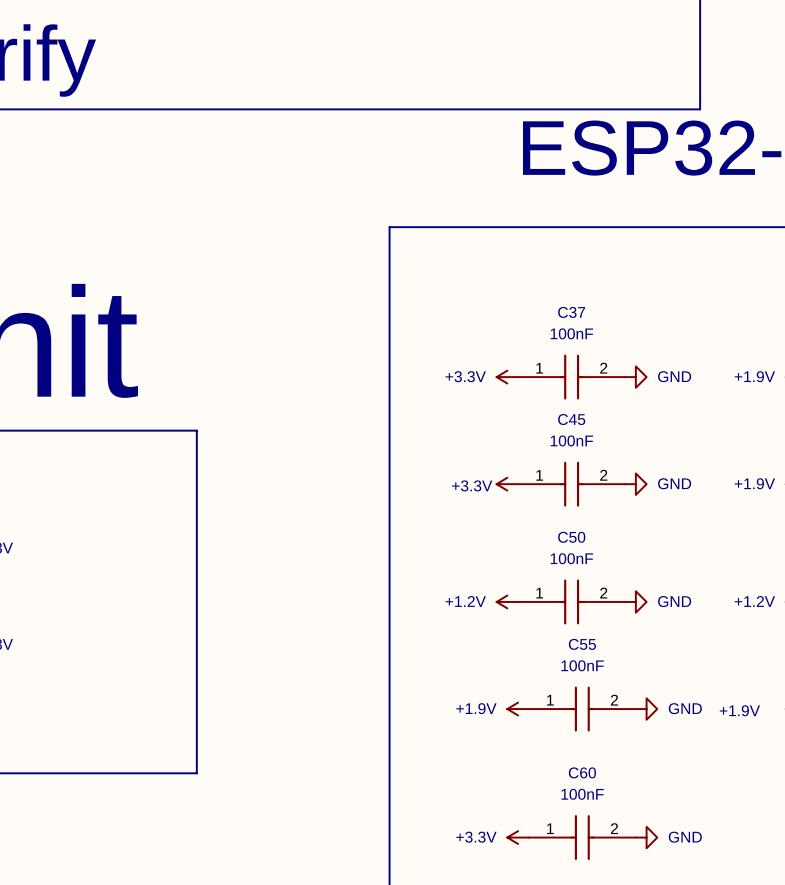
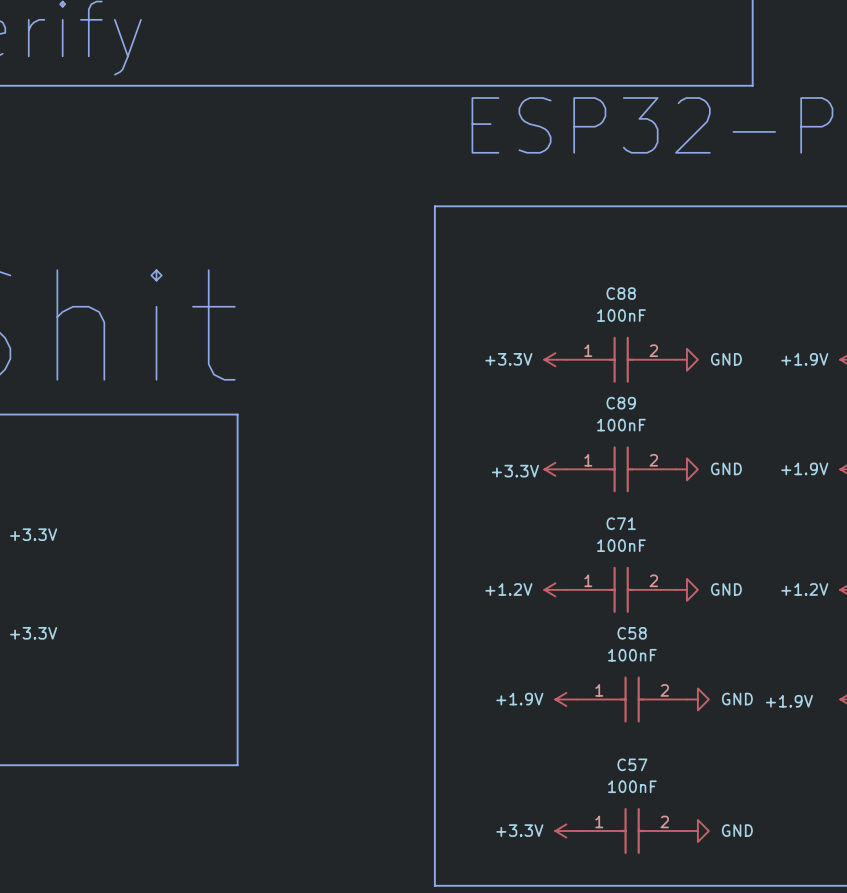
C37 name: C37 (571, 312) -> C88 (621, 293)
C45 name: C45 (571, 419) -> C89 (621, 403)
C50 name: C50 (571, 537) -> C71 (621, 523)
C55 name: C55 (582, 644) -> C58 (632, 633)
C60 name: C60 (582, 772) -> C57 (632, 764)

